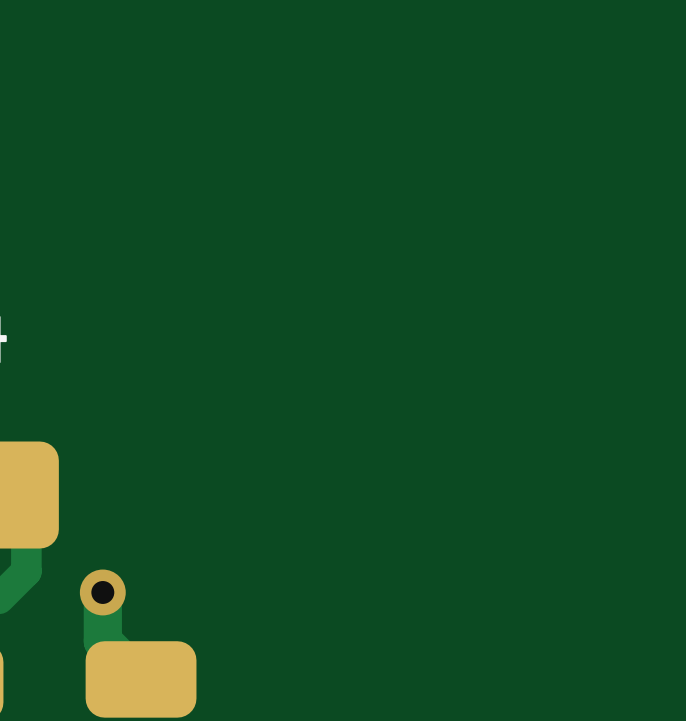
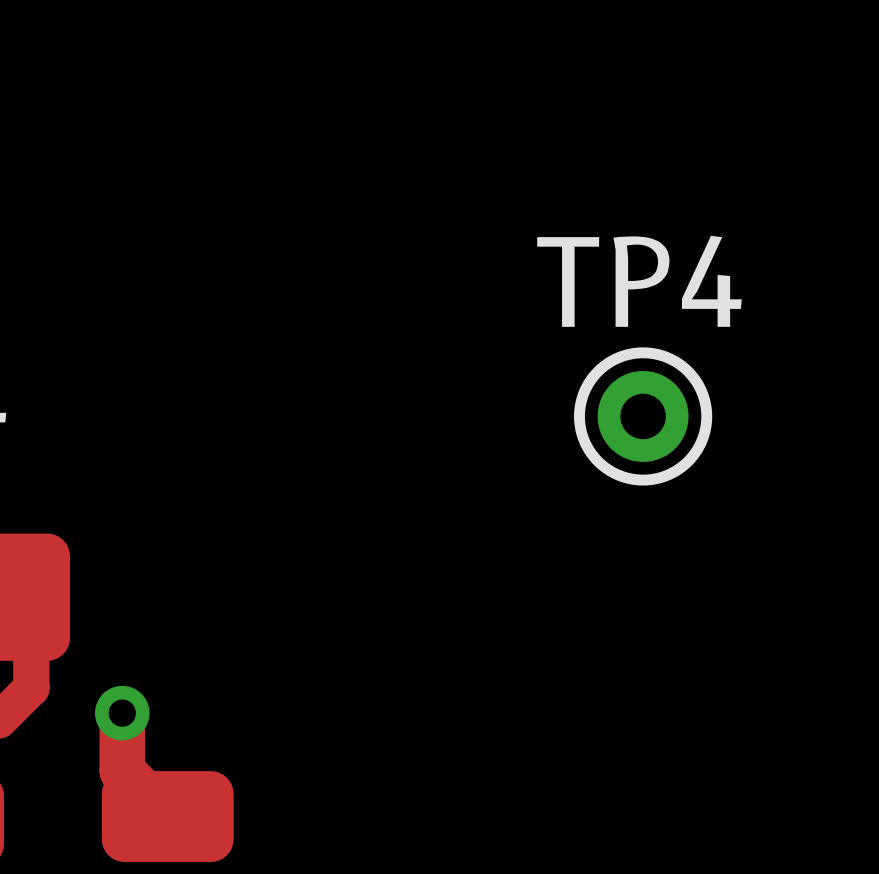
TP4: none -> (643, 416)

